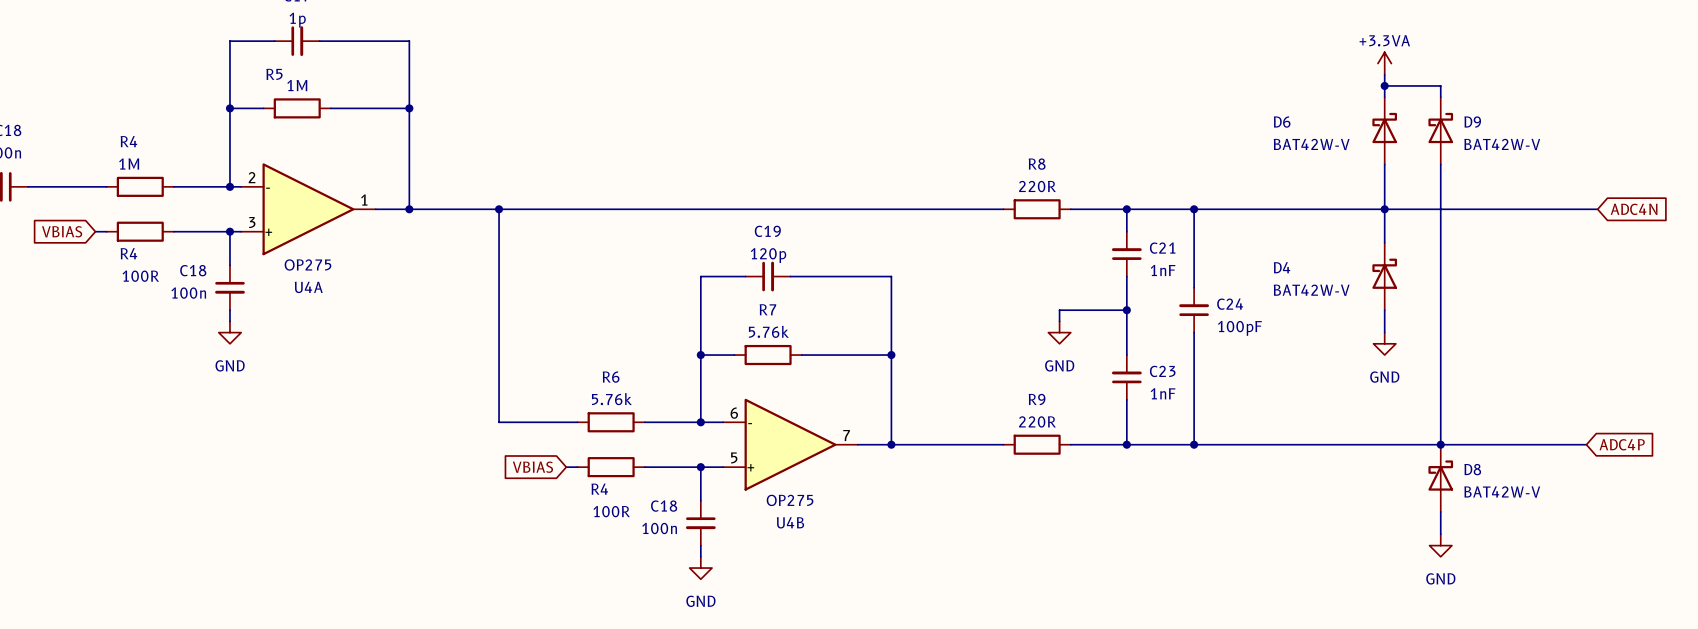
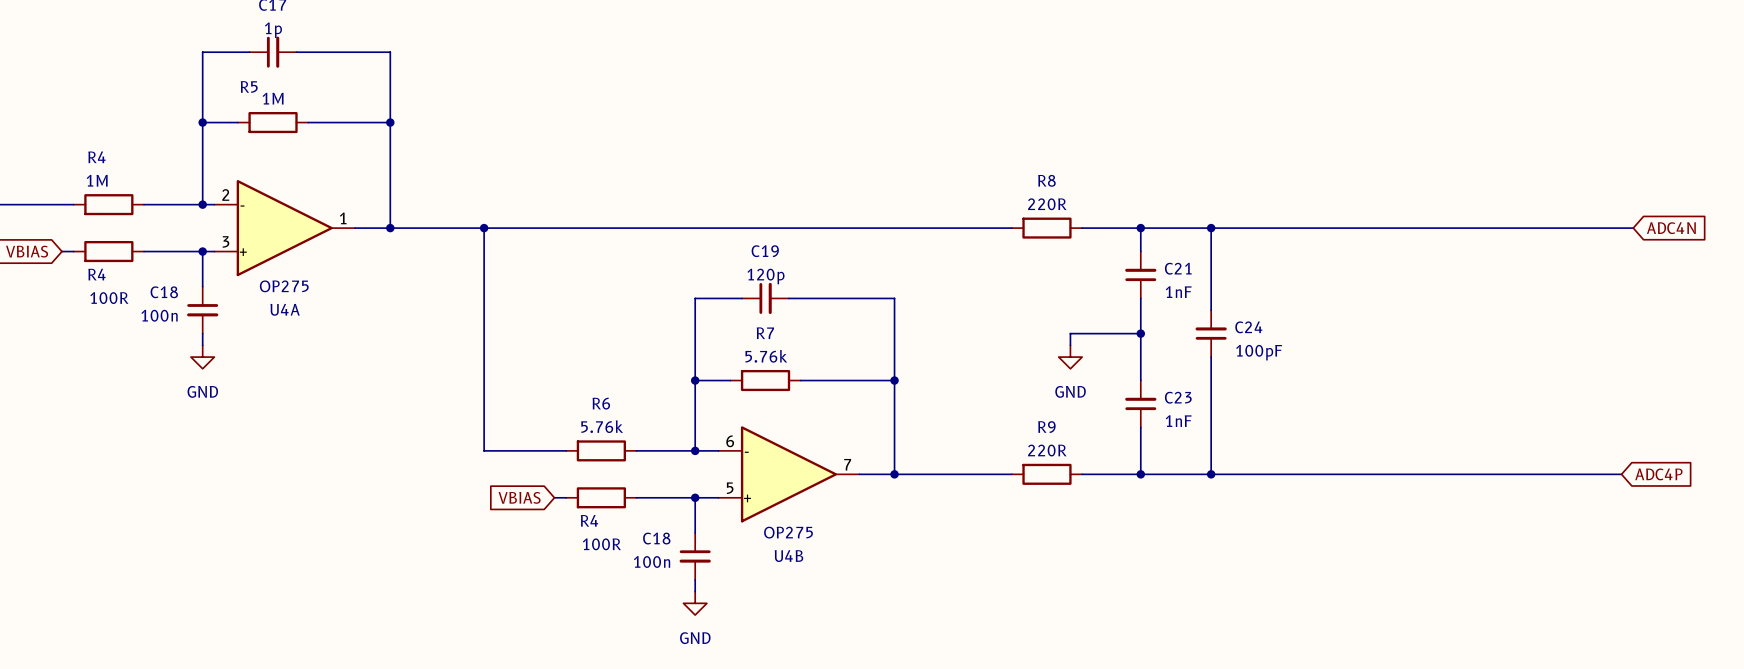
power symbol: +3.3VA (1384, 63) -> none
wire: (1384, 74) (1384, 97) -> none
wire: (1384, 85) (1440, 85) (1440, 97) -> none
junction: (1384, 85) -> none
D6: BAT42W-V (1384, 130) -> none
D9: BAT42W-V (1440, 130) -> none
wire: (1384, 164) (1384, 242) -> none
wire: (1440, 164) (1440, 444) -> none
junction: (1384, 209) -> none
D4: BAT42W-V (1384, 276) -> none
wire: (1384, 310) (1384, 332) -> none
power symbol: GND (1384, 343) -> none
junction: (1440, 444) -> none
D8: BAT42W-V (1440, 478) -> none
wire: (1440, 511) (1440, 534) -> none
power symbol: GND (1440, 545) -> none

